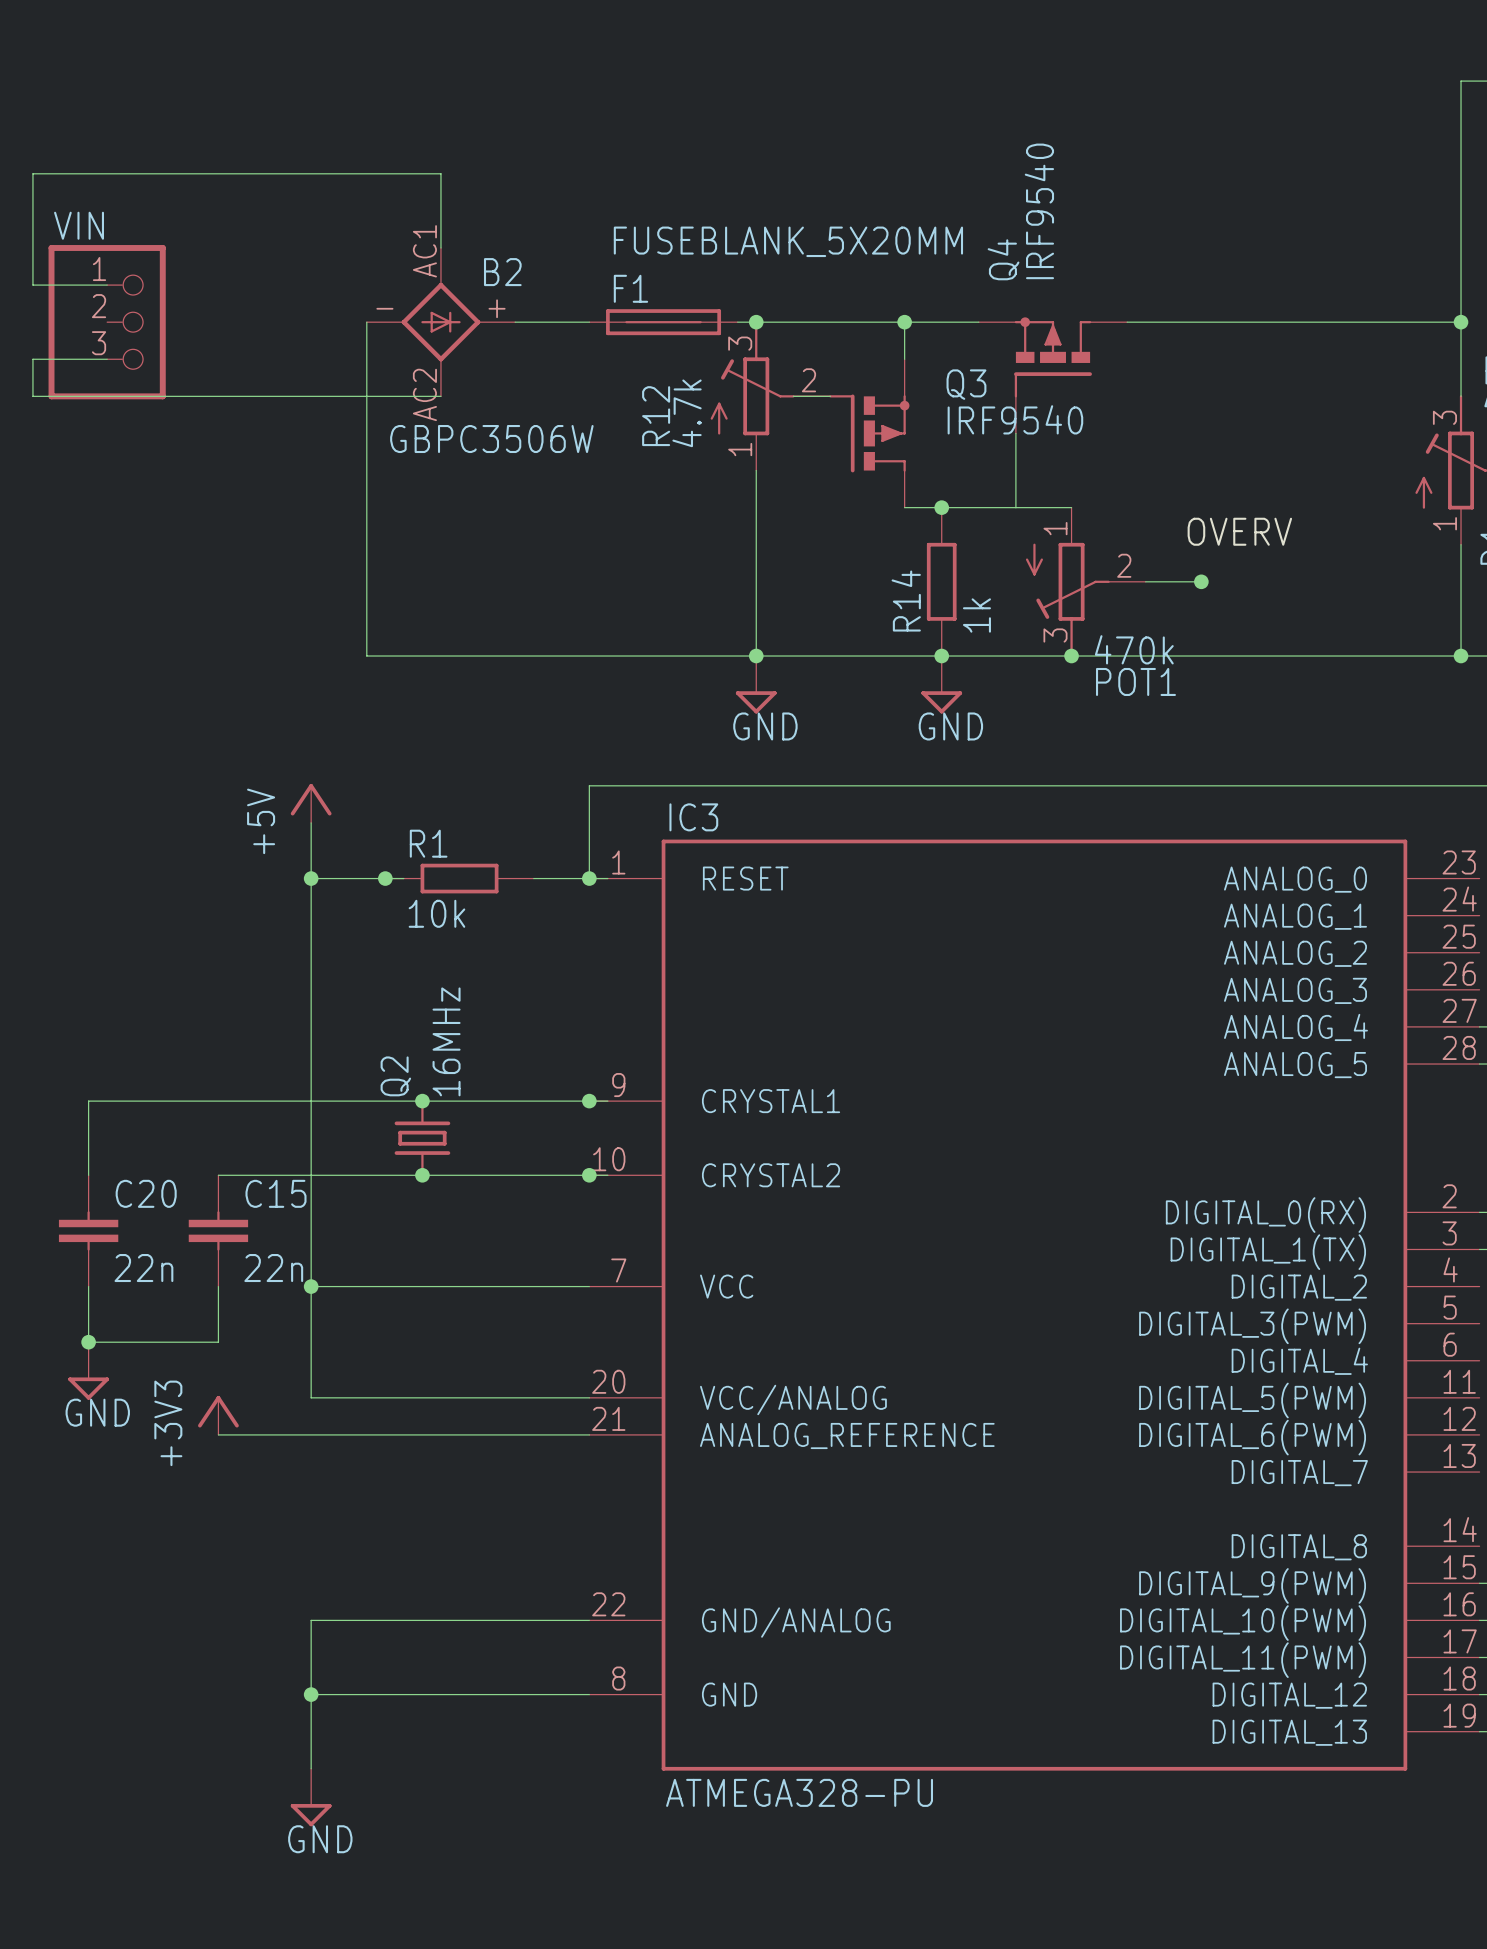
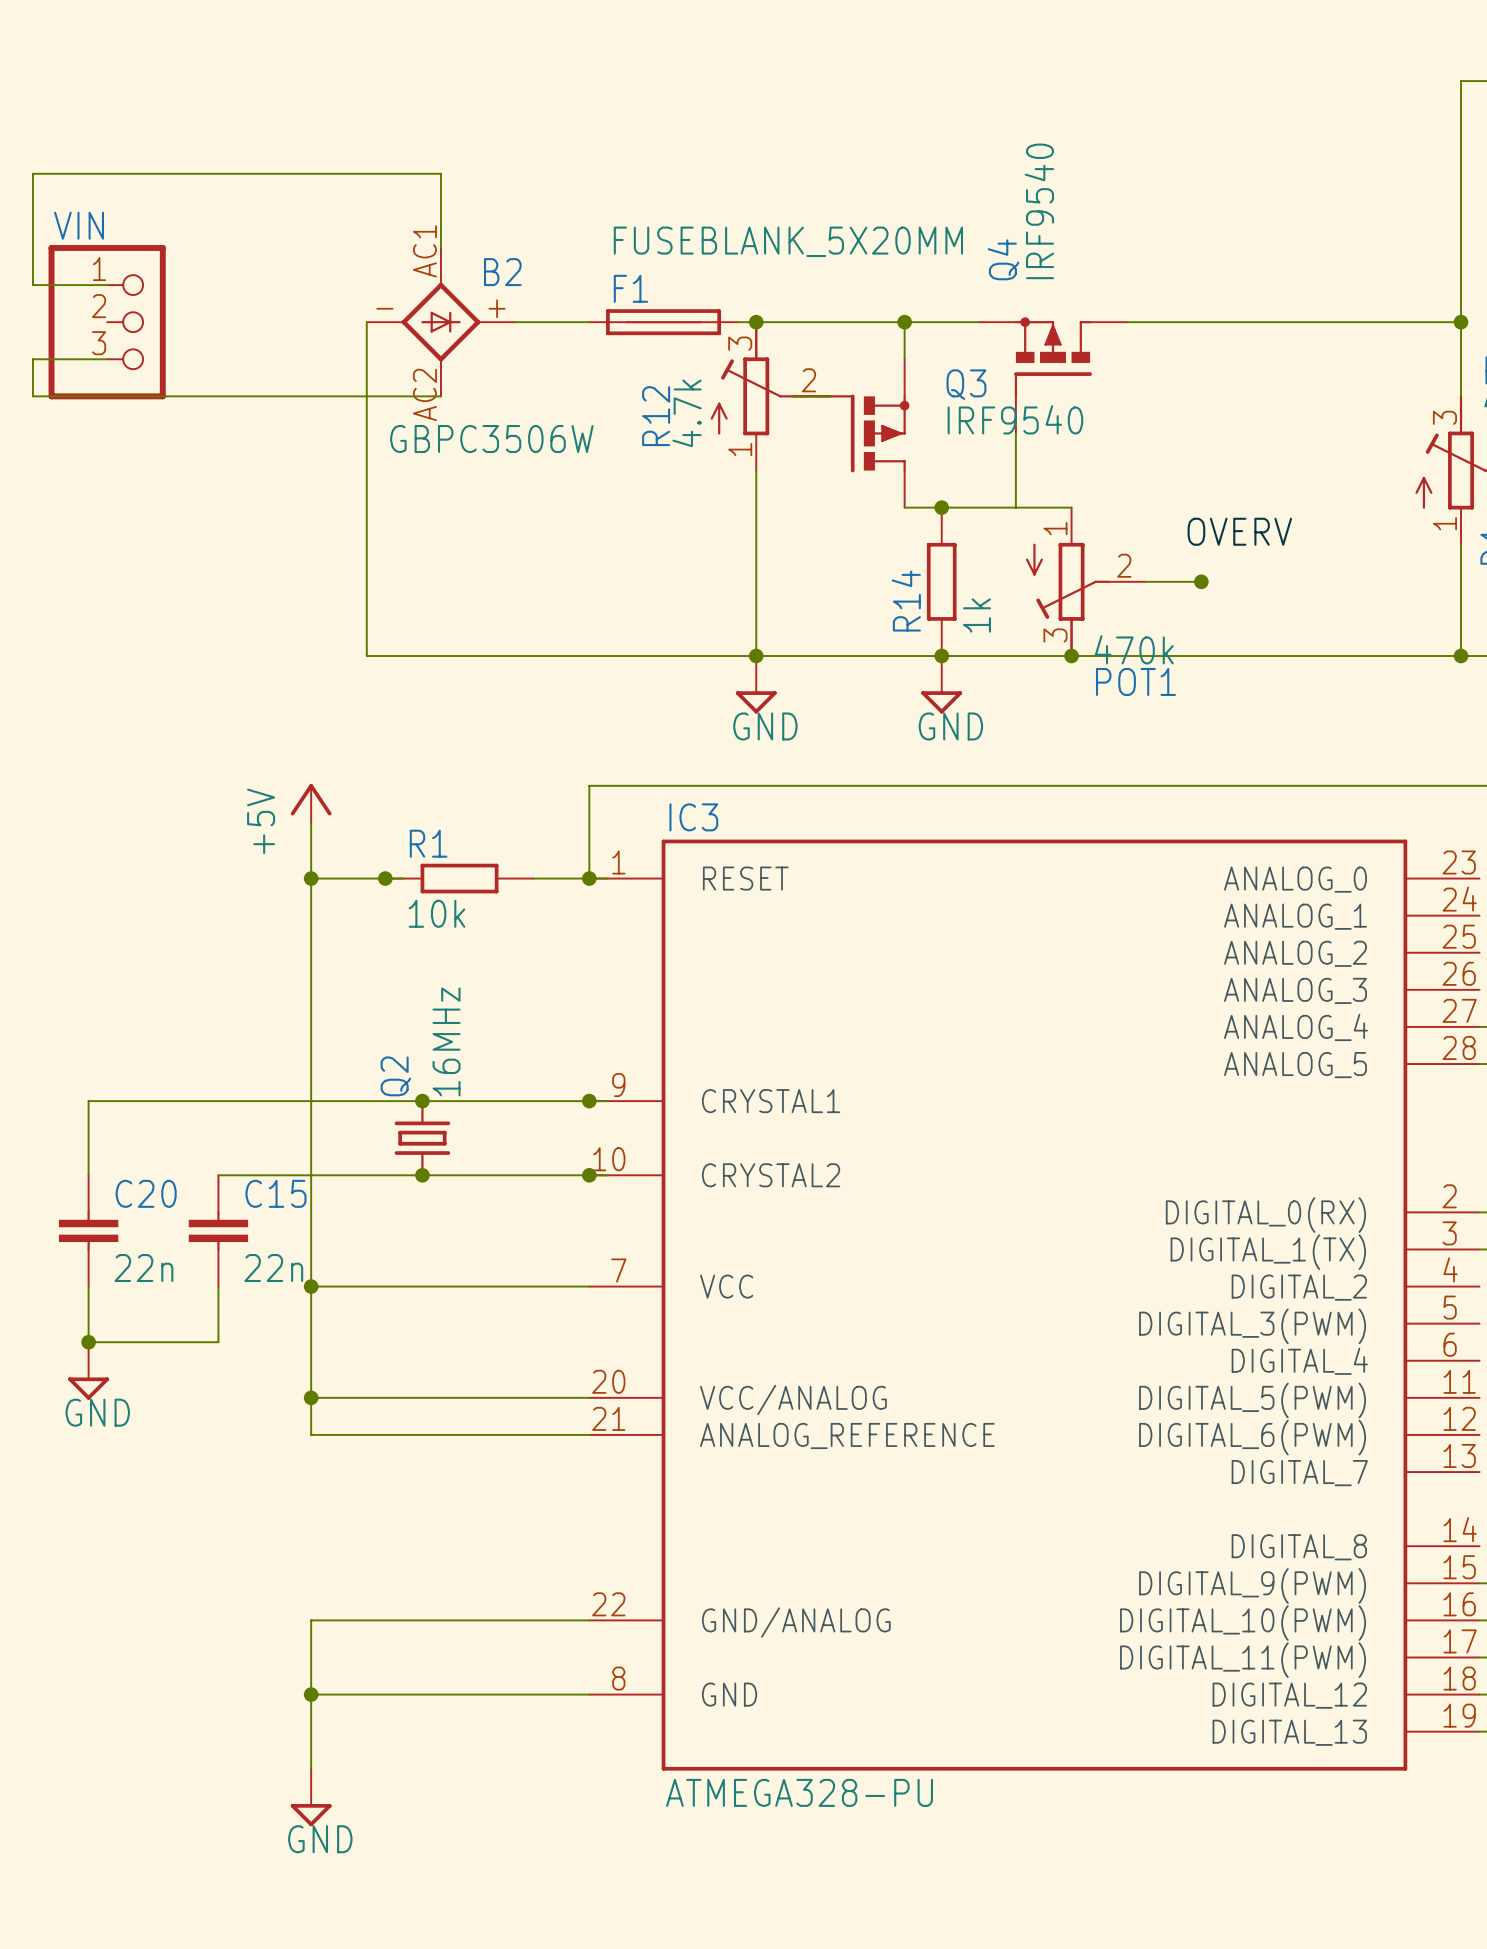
junction: none -> (311, 1397)
power symbol: +3V3 (218, 1415) -> none
wire: (218, 1434) (311, 1434) -> (311, 1397) (311, 1434)

